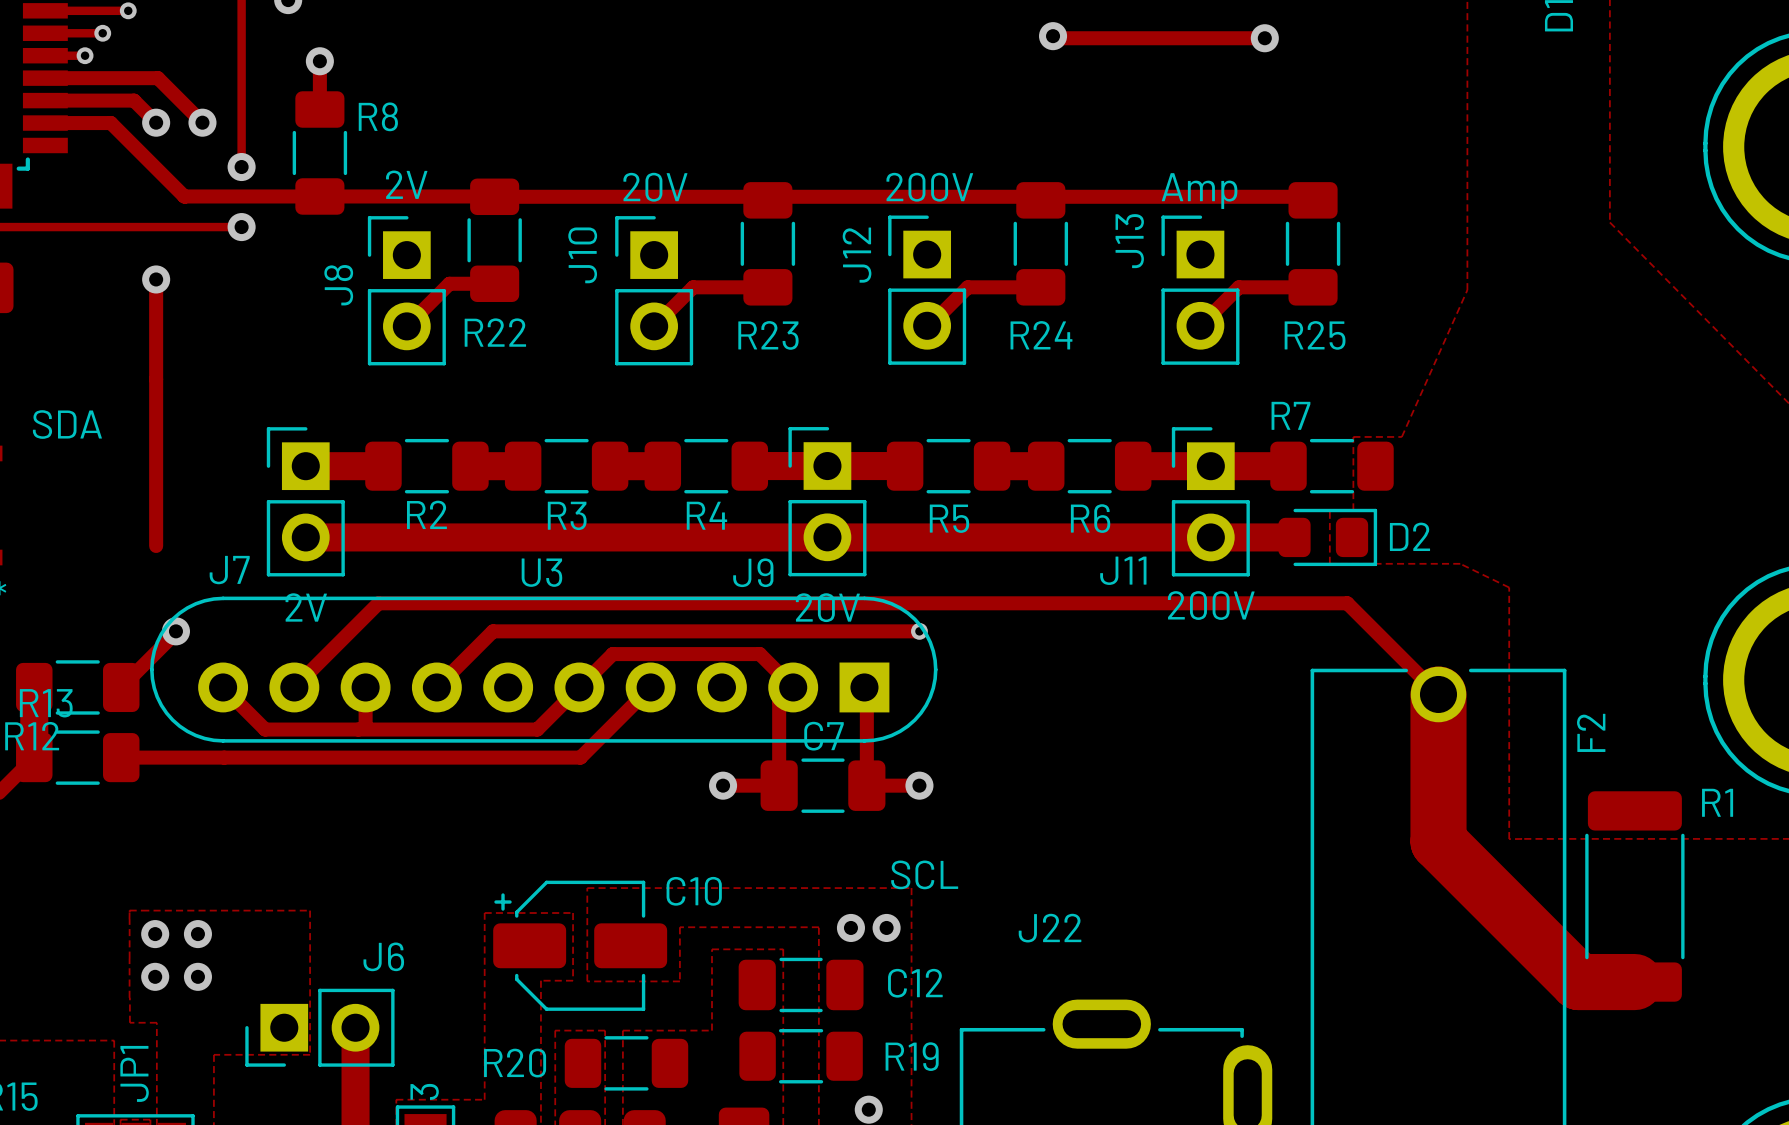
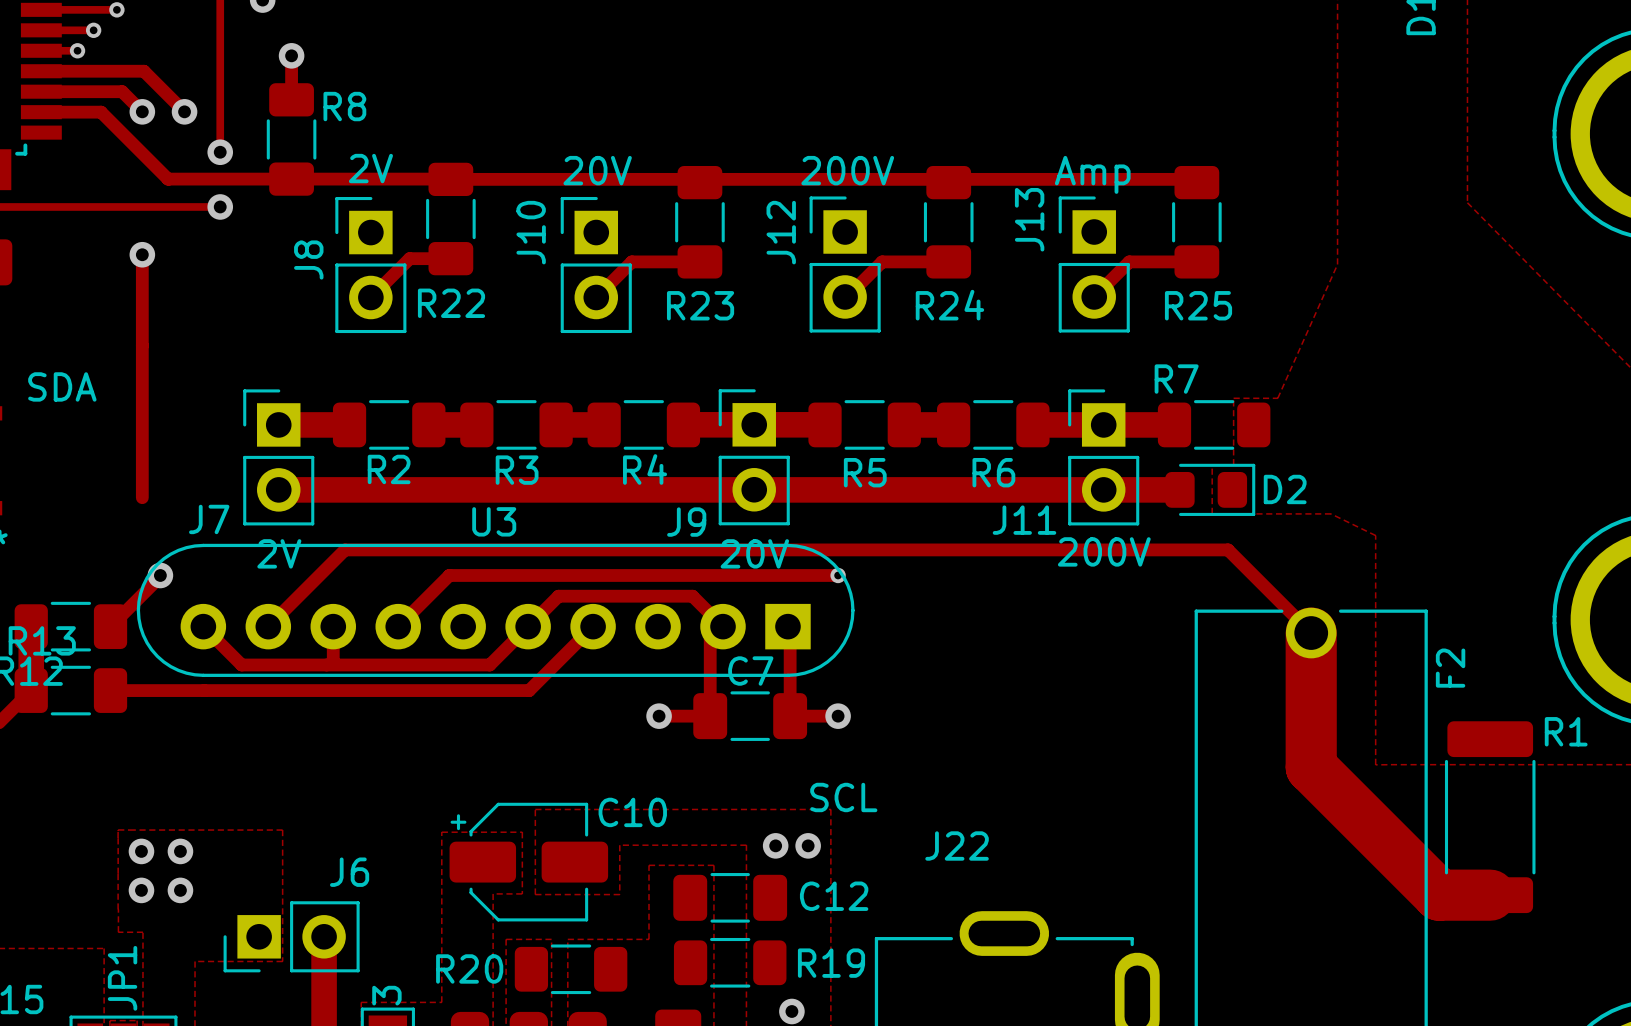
via: (1053, 36) -> none
track: (1055, 38) (1264, 38) -> none
via: (1264, 38) -> none

